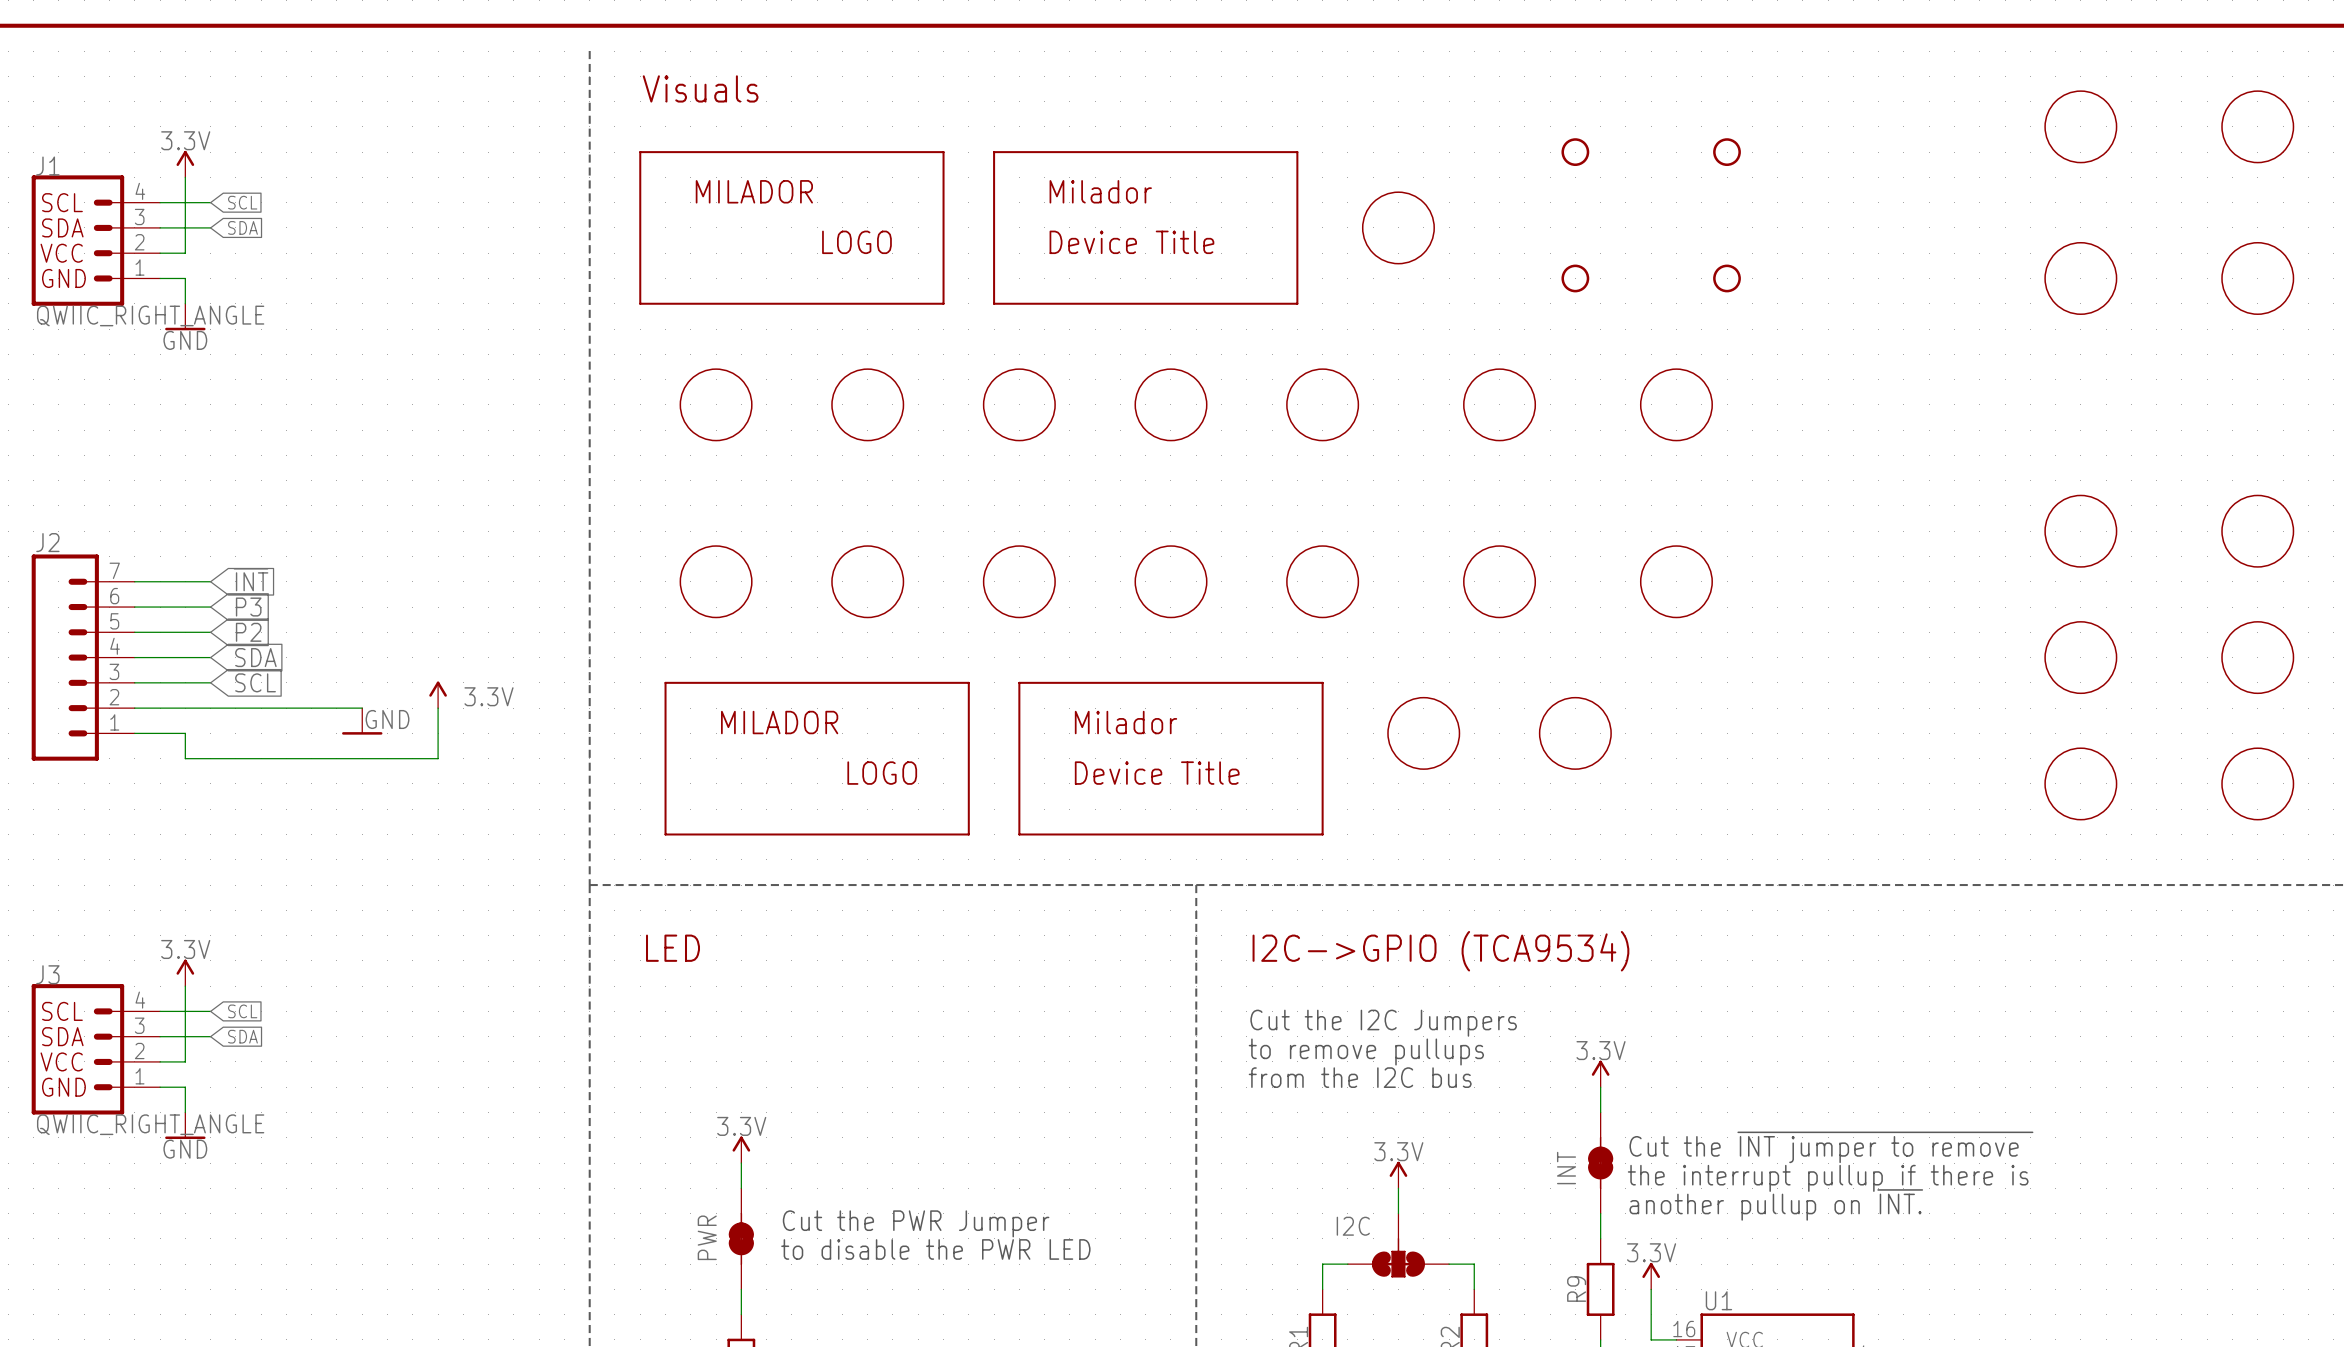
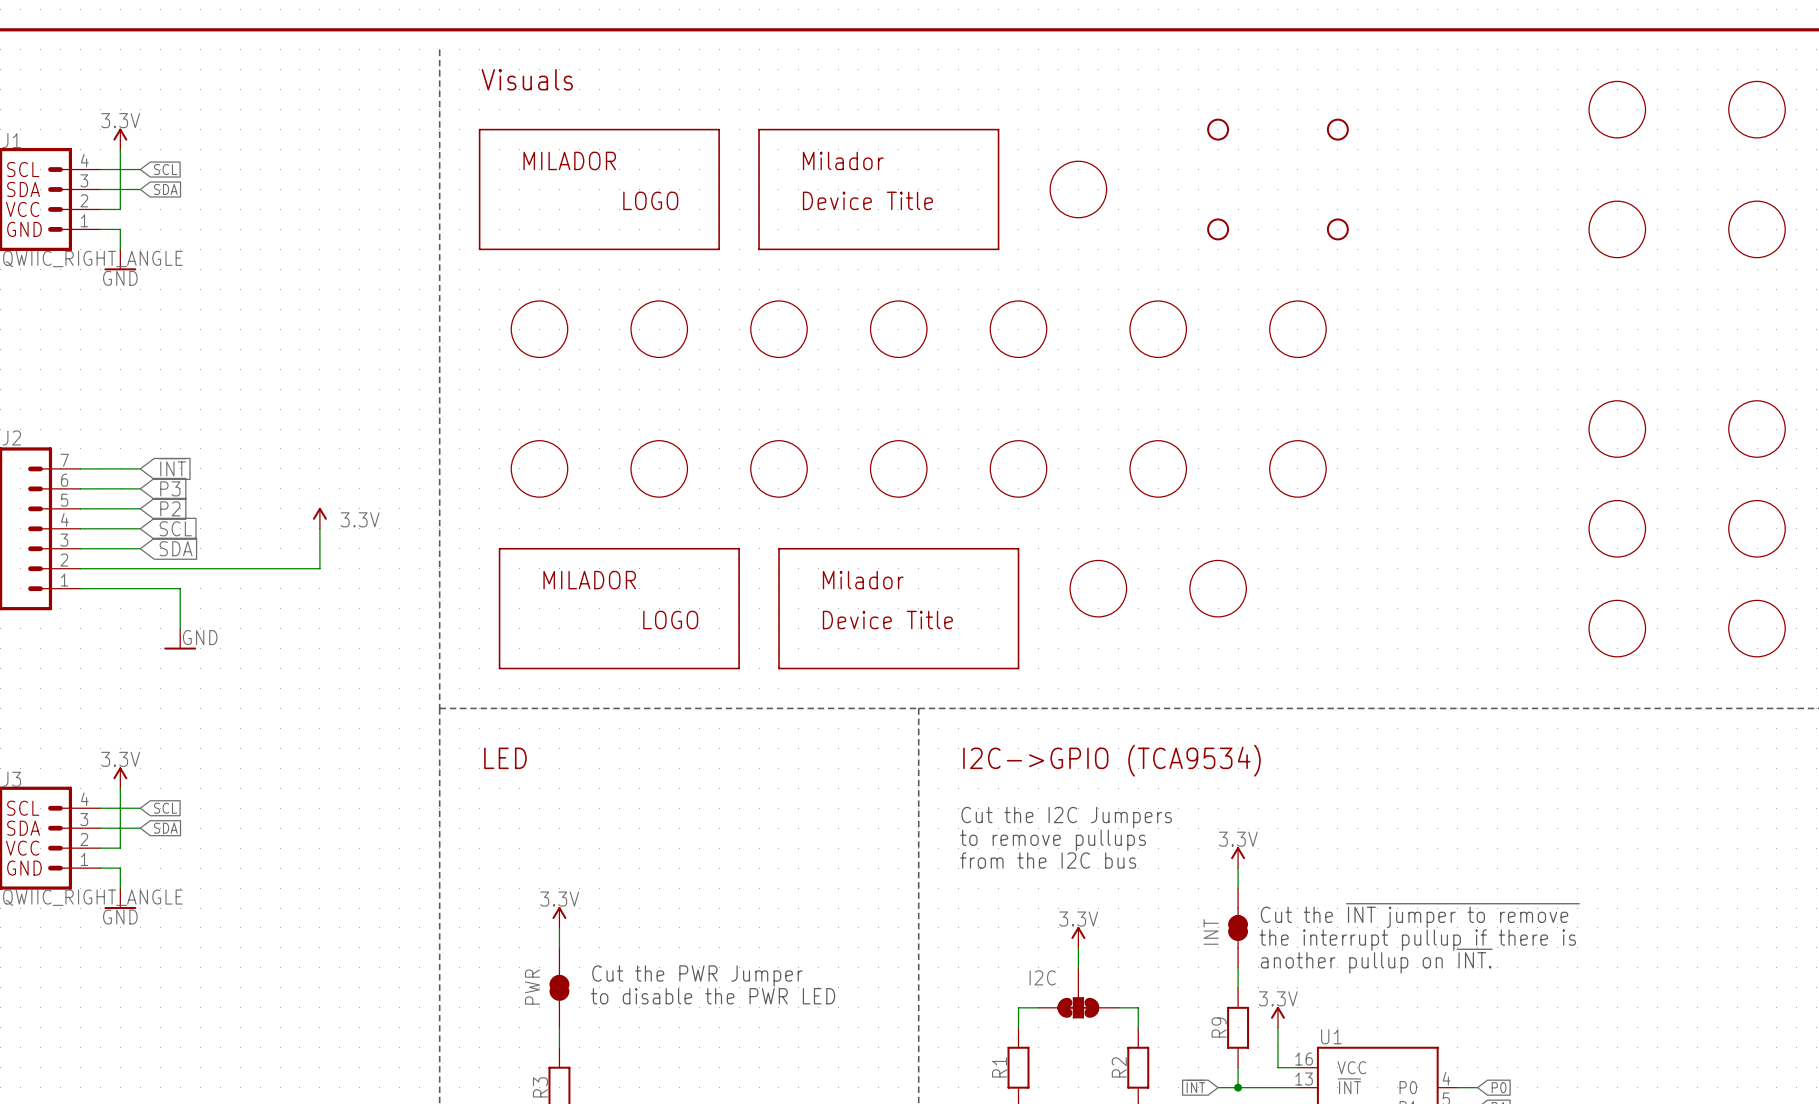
global label: SDA (255, 657) -> SCL (175, 528)
wire: none -> (319, 528) (319, 568) (260, 568)
global label: SCL (255, 682) -> SDA (176, 548)
power symbol position: 3.3V (438, 694) -> 3.3V (319, 518)
wire: (438, 708) (438, 758) (185, 758) (185, 733) -> (180, 628) (180, 588) (120, 588)
power symbol position: GND (362, 721) -> GND (180, 639)

